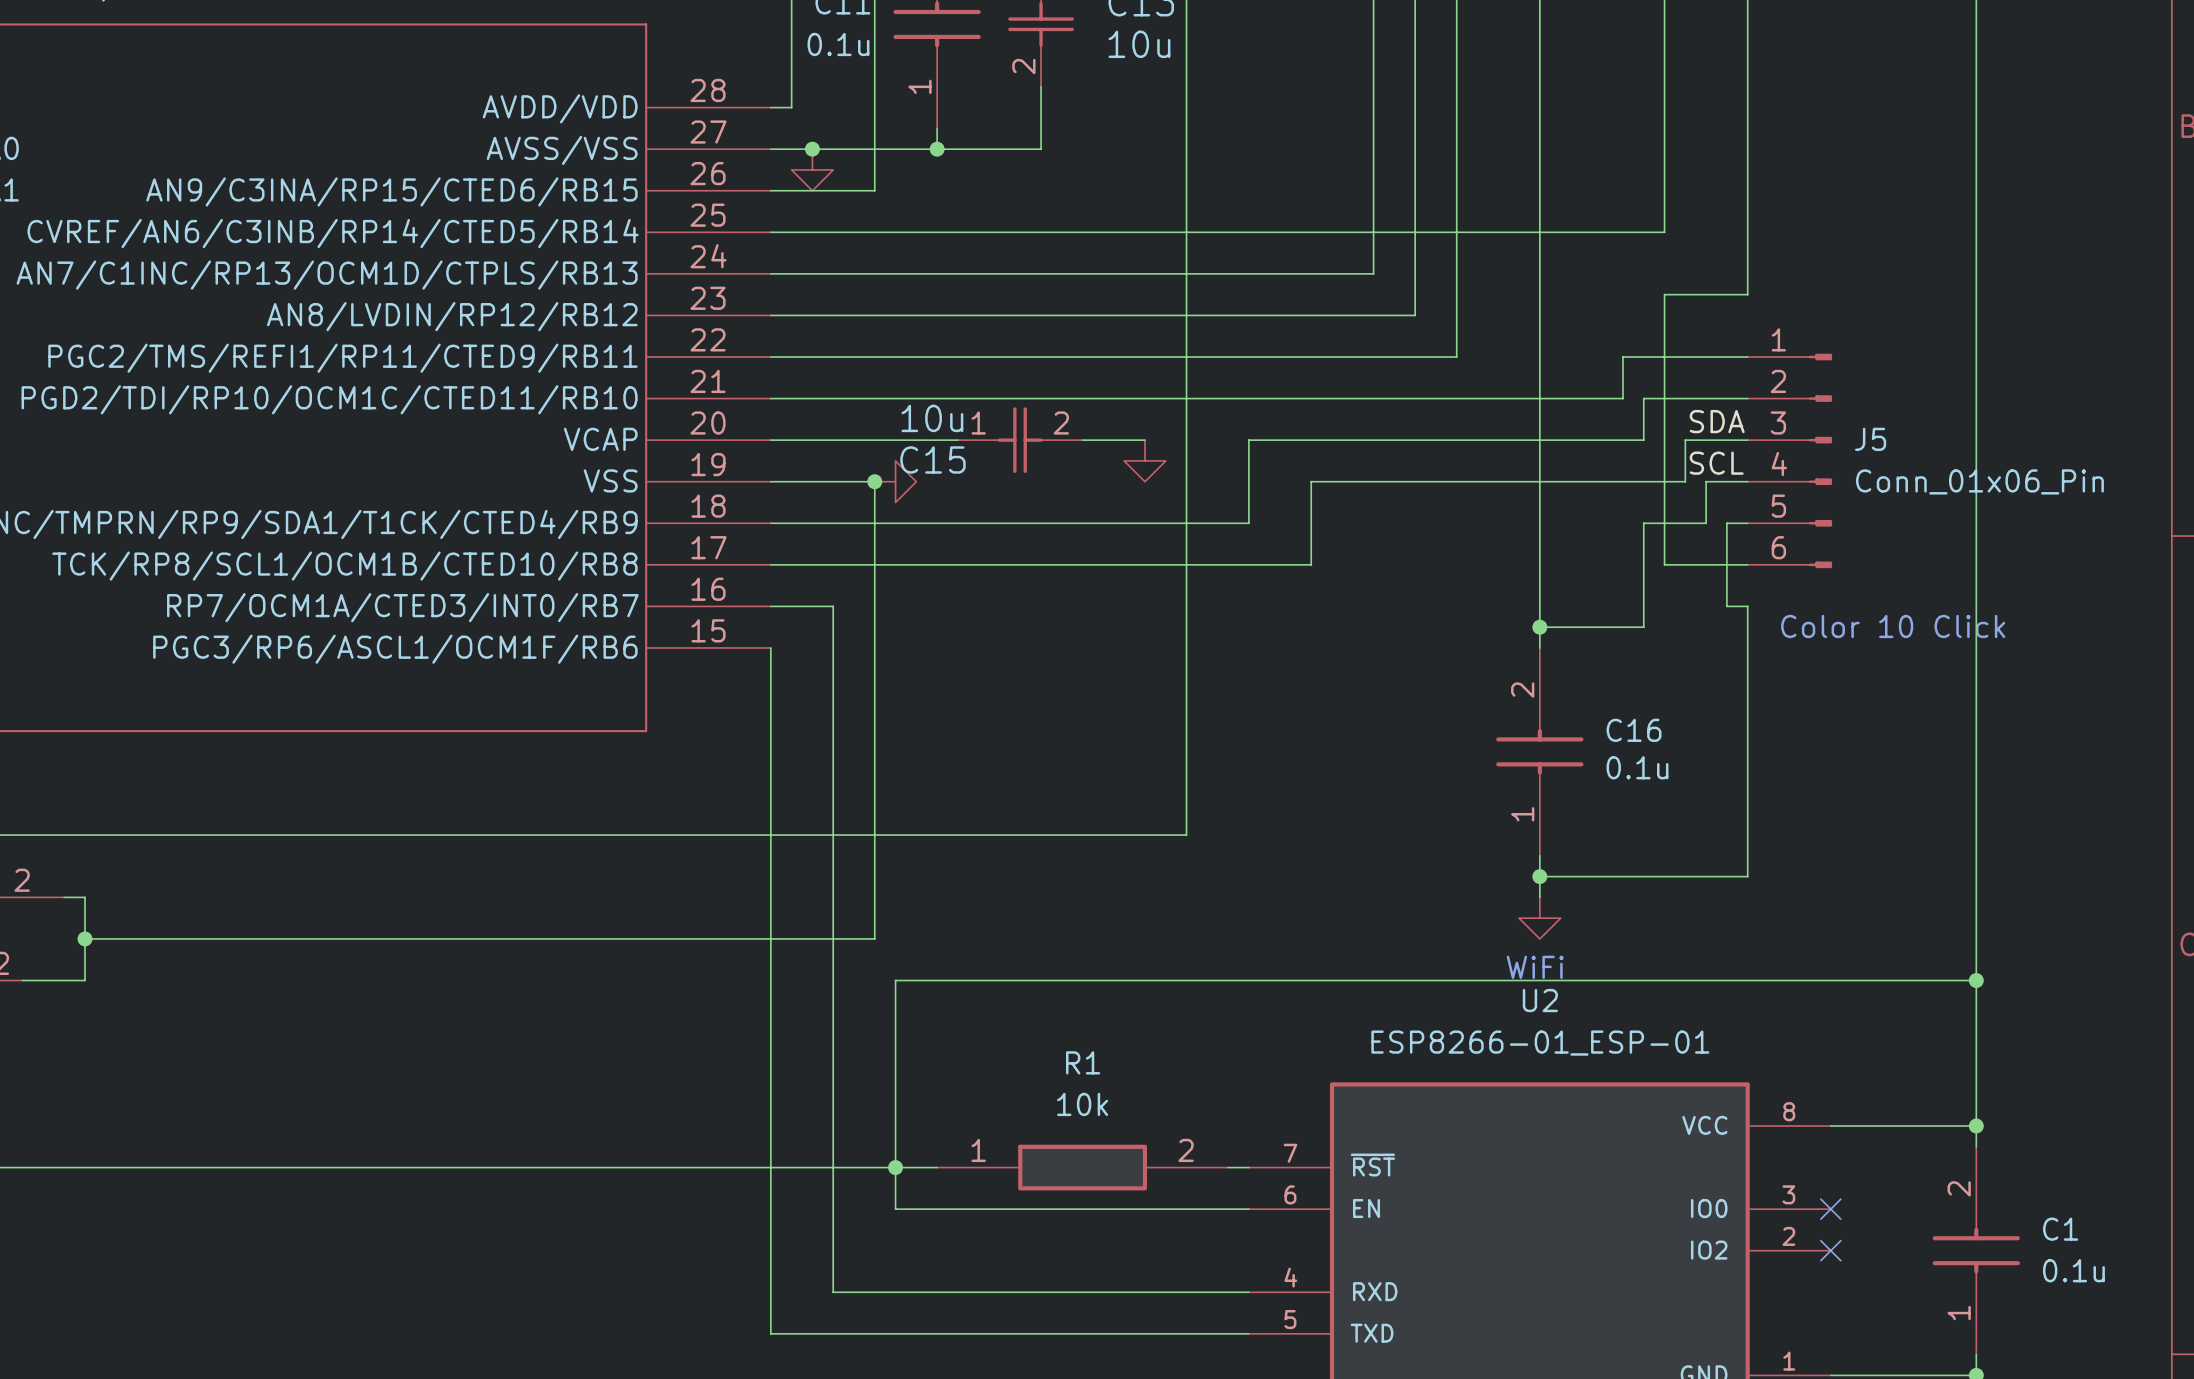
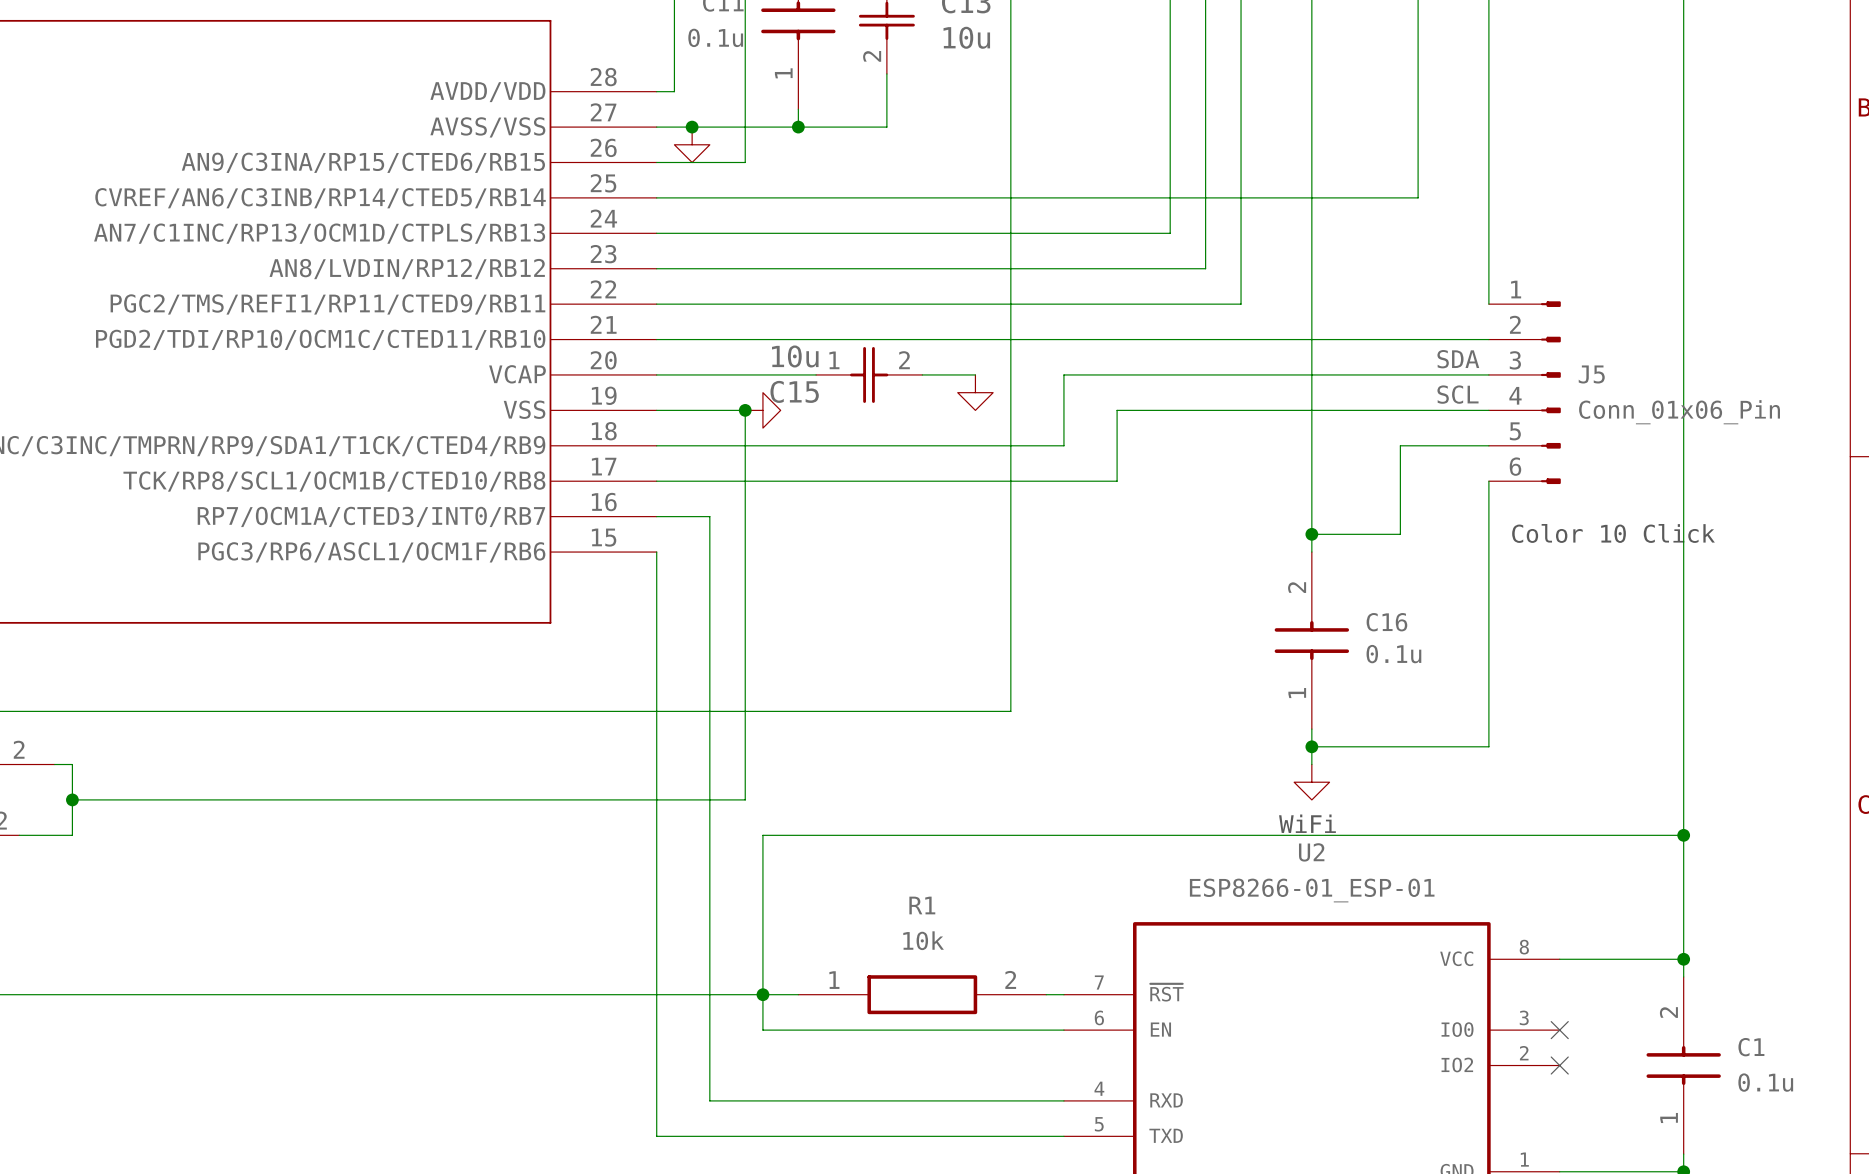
wire: (1747, 294) (1664, 294) (1664, 564) (1747, 564) -> none
wire: (1747, 357) (1622, 357) (1622, 398) -> (1488, 304) (1488, 251)
wire: (1643, 398) (1643, 440) -> (1400, 339) (1382, 339)
wire: none -> (1400, 374) (1435, 374)
wire: (1685, 440) (1685, 481) -> (1453, 410) (1435, 410)
wire: (1706, 481) (1706, 523) -> (1471, 445) (1453, 445)
wire: (1726, 523) (1726, 606) (1747, 606) -> (1488, 481) (1488, 516)

